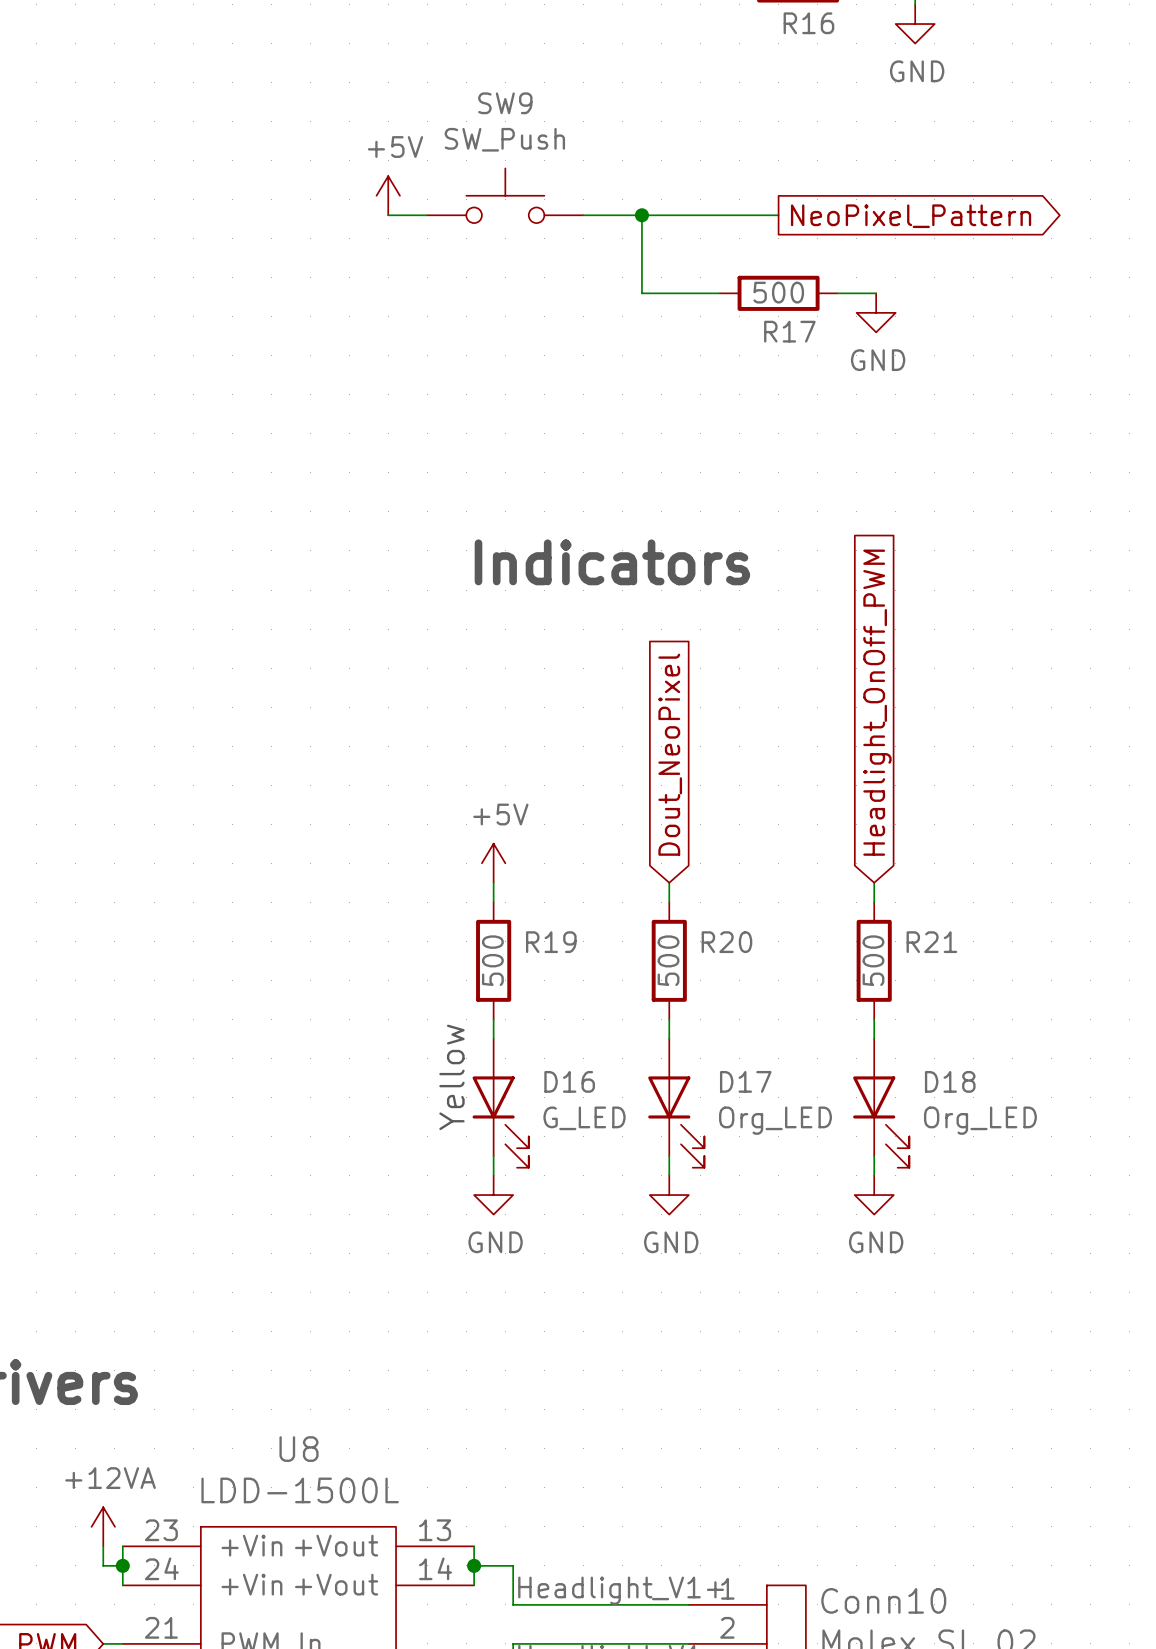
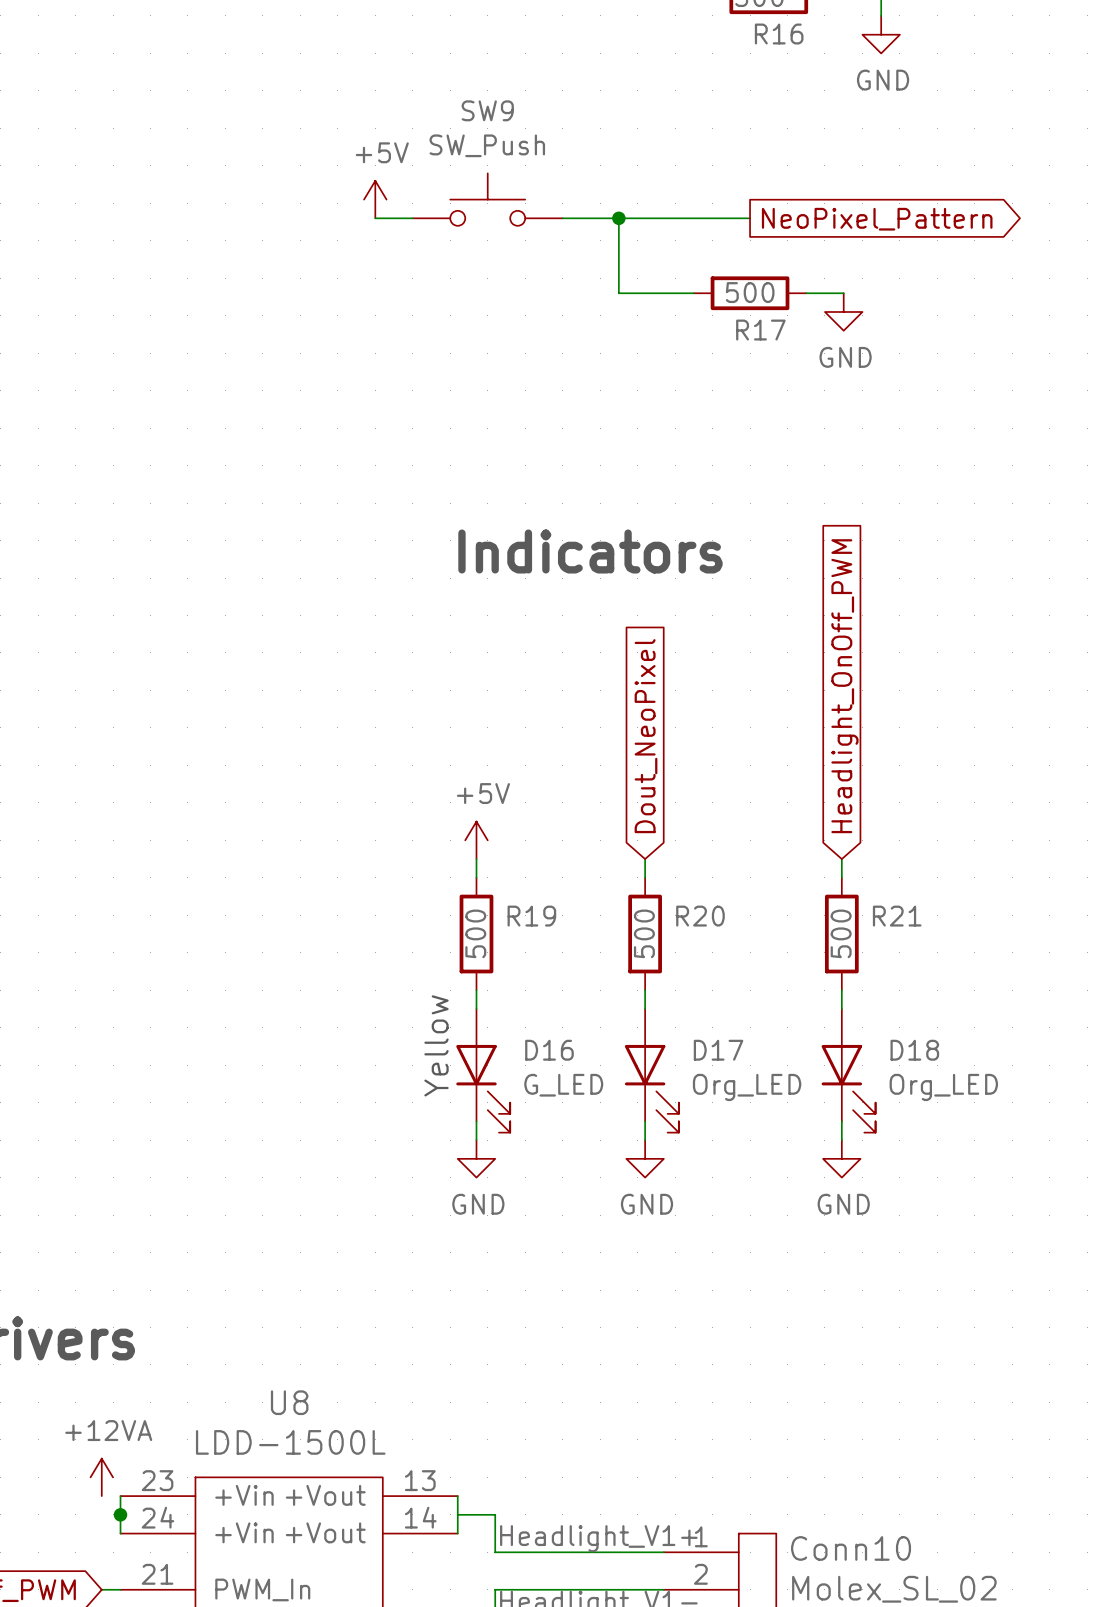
wire: (103, 1546) (103, 1565) (122, 1565) -> none
junction: (474, 1565) -> none

